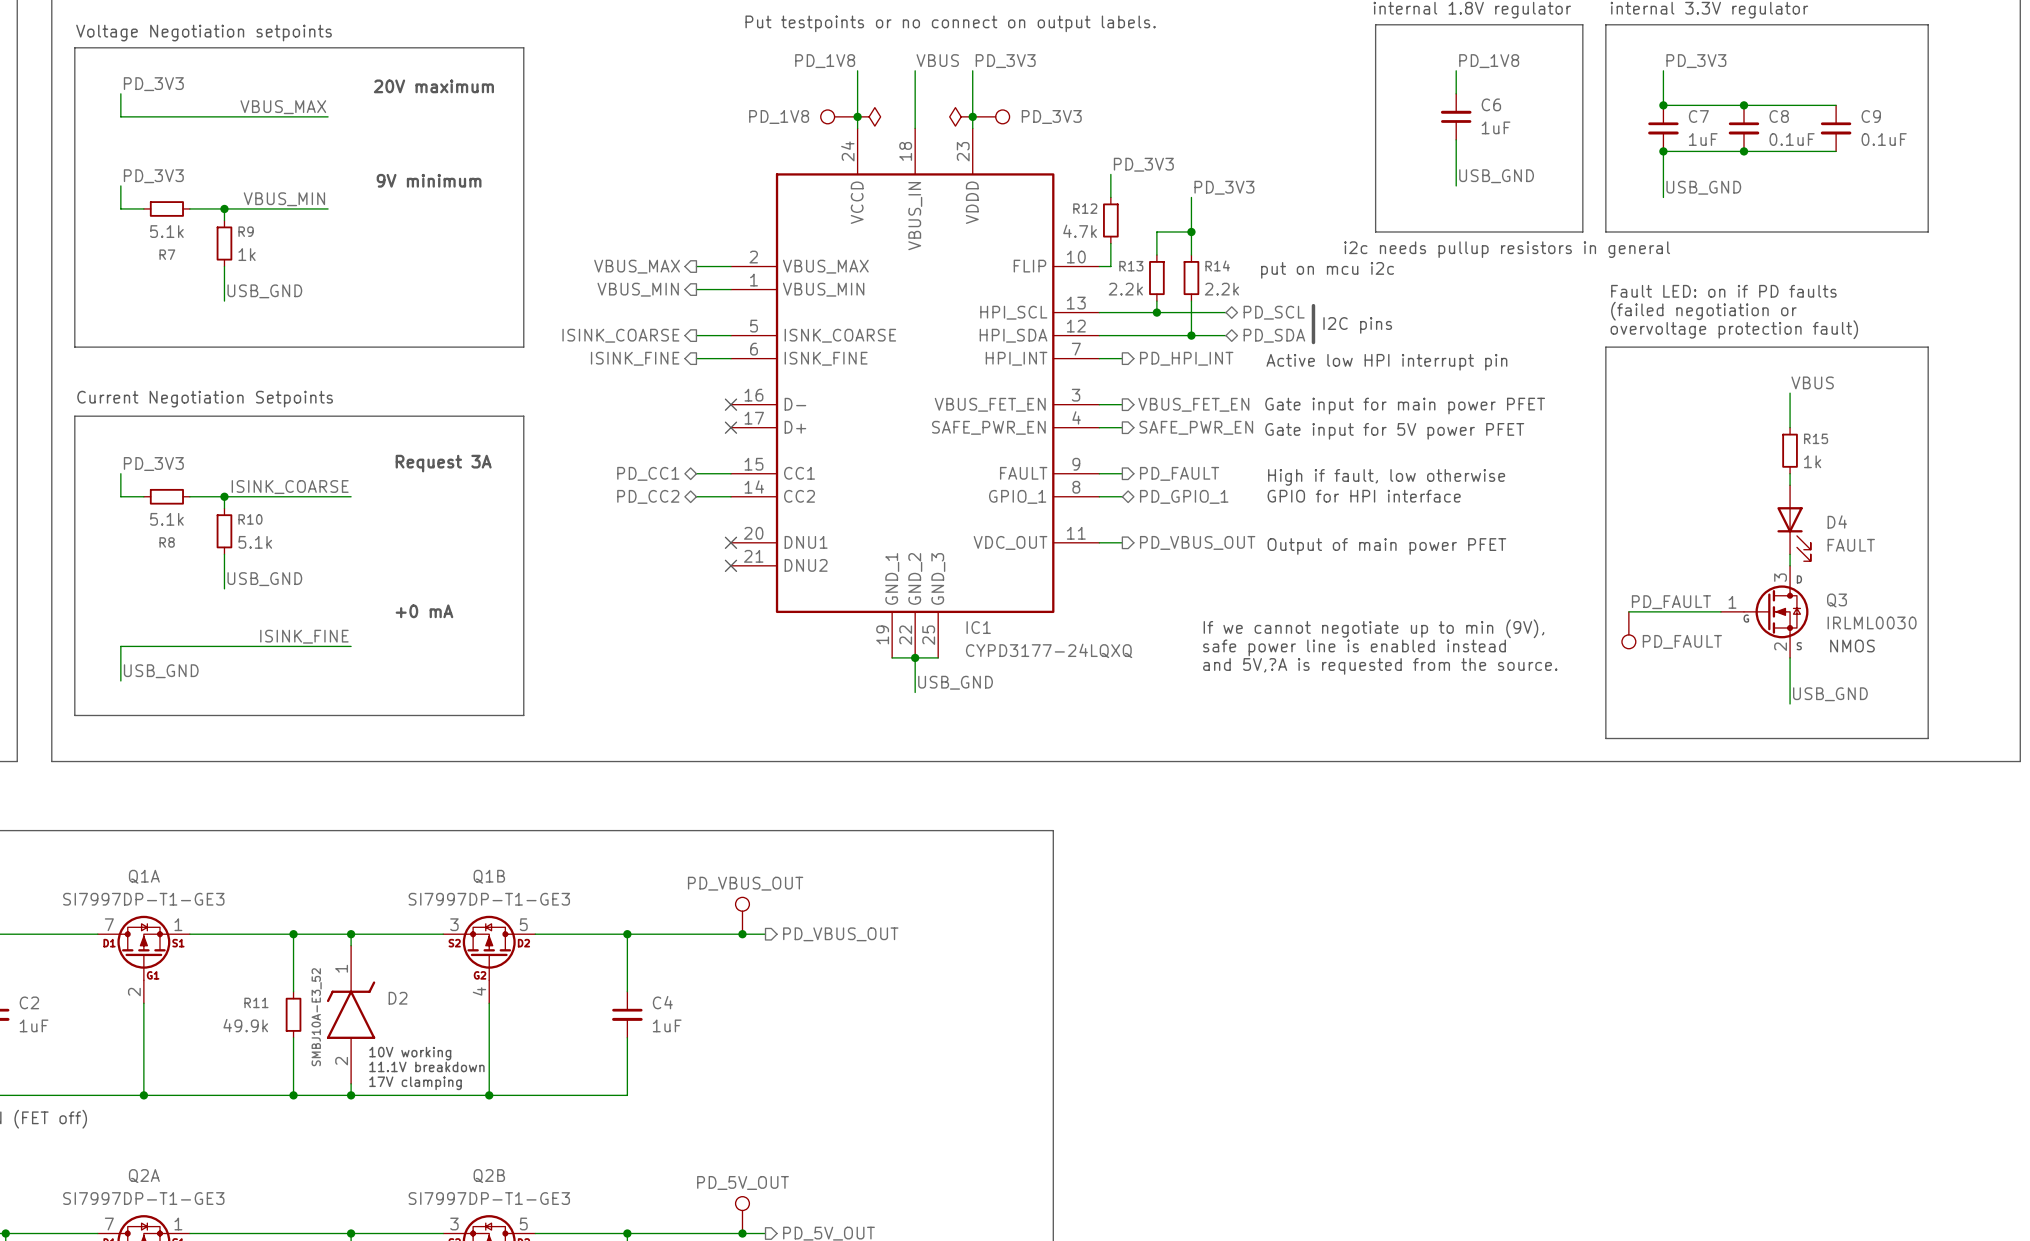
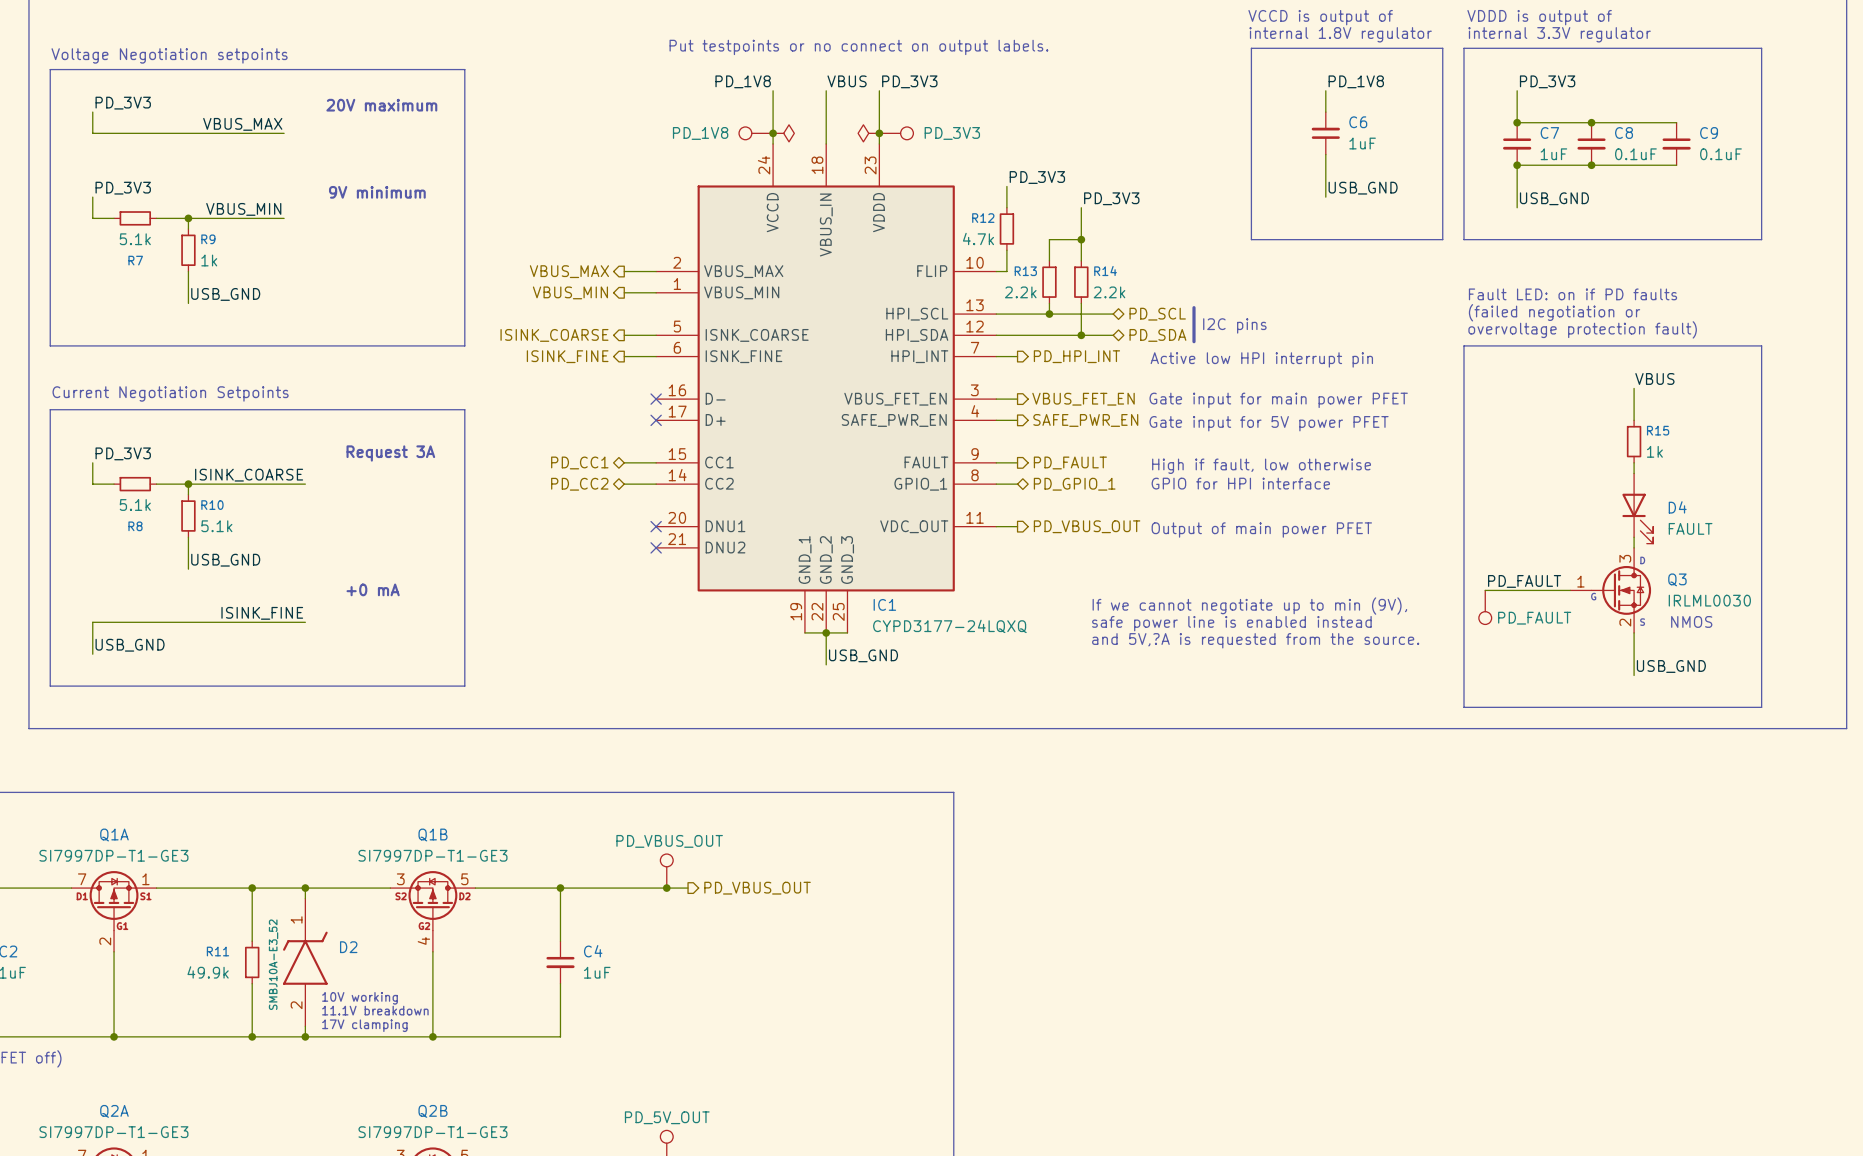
text: i2c needs pullup resistors in general (1507, 249) -> none
text: put on mcu i2c (1327, 270) -> none

